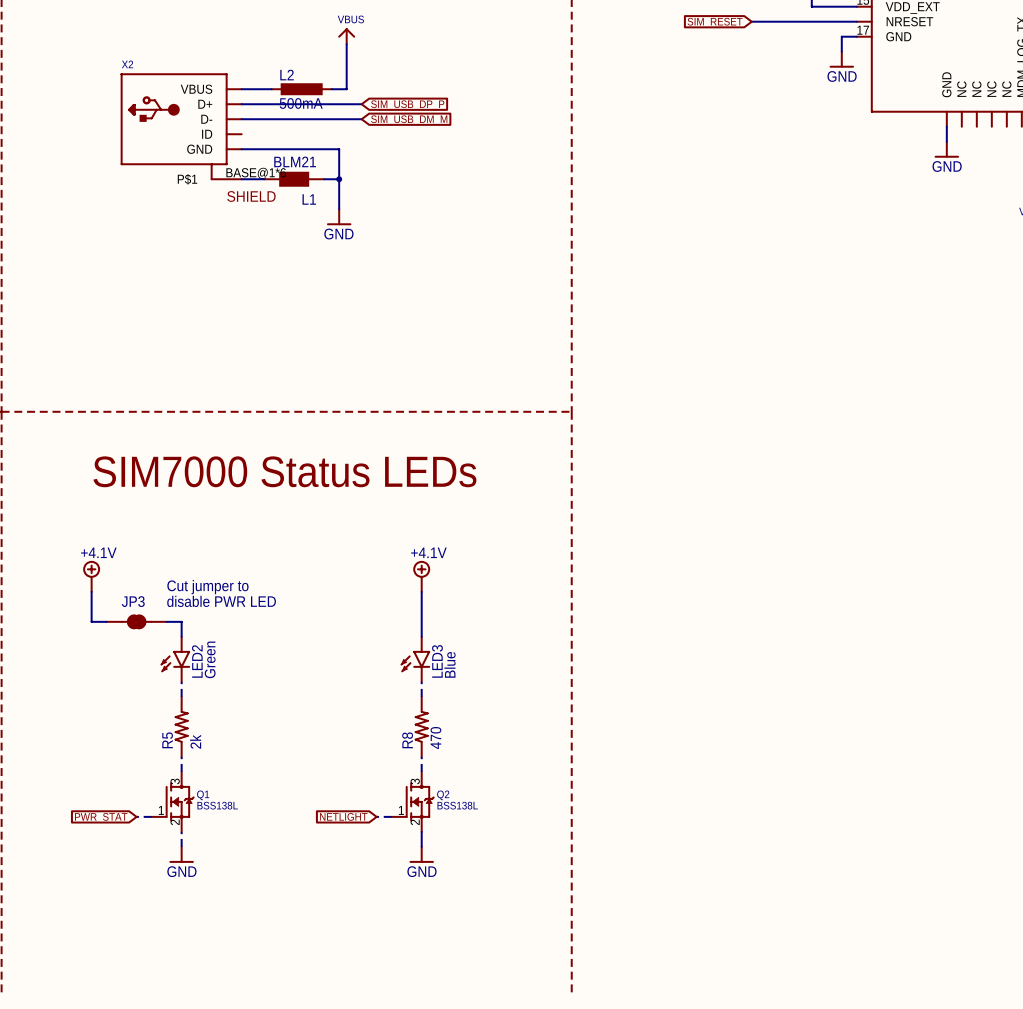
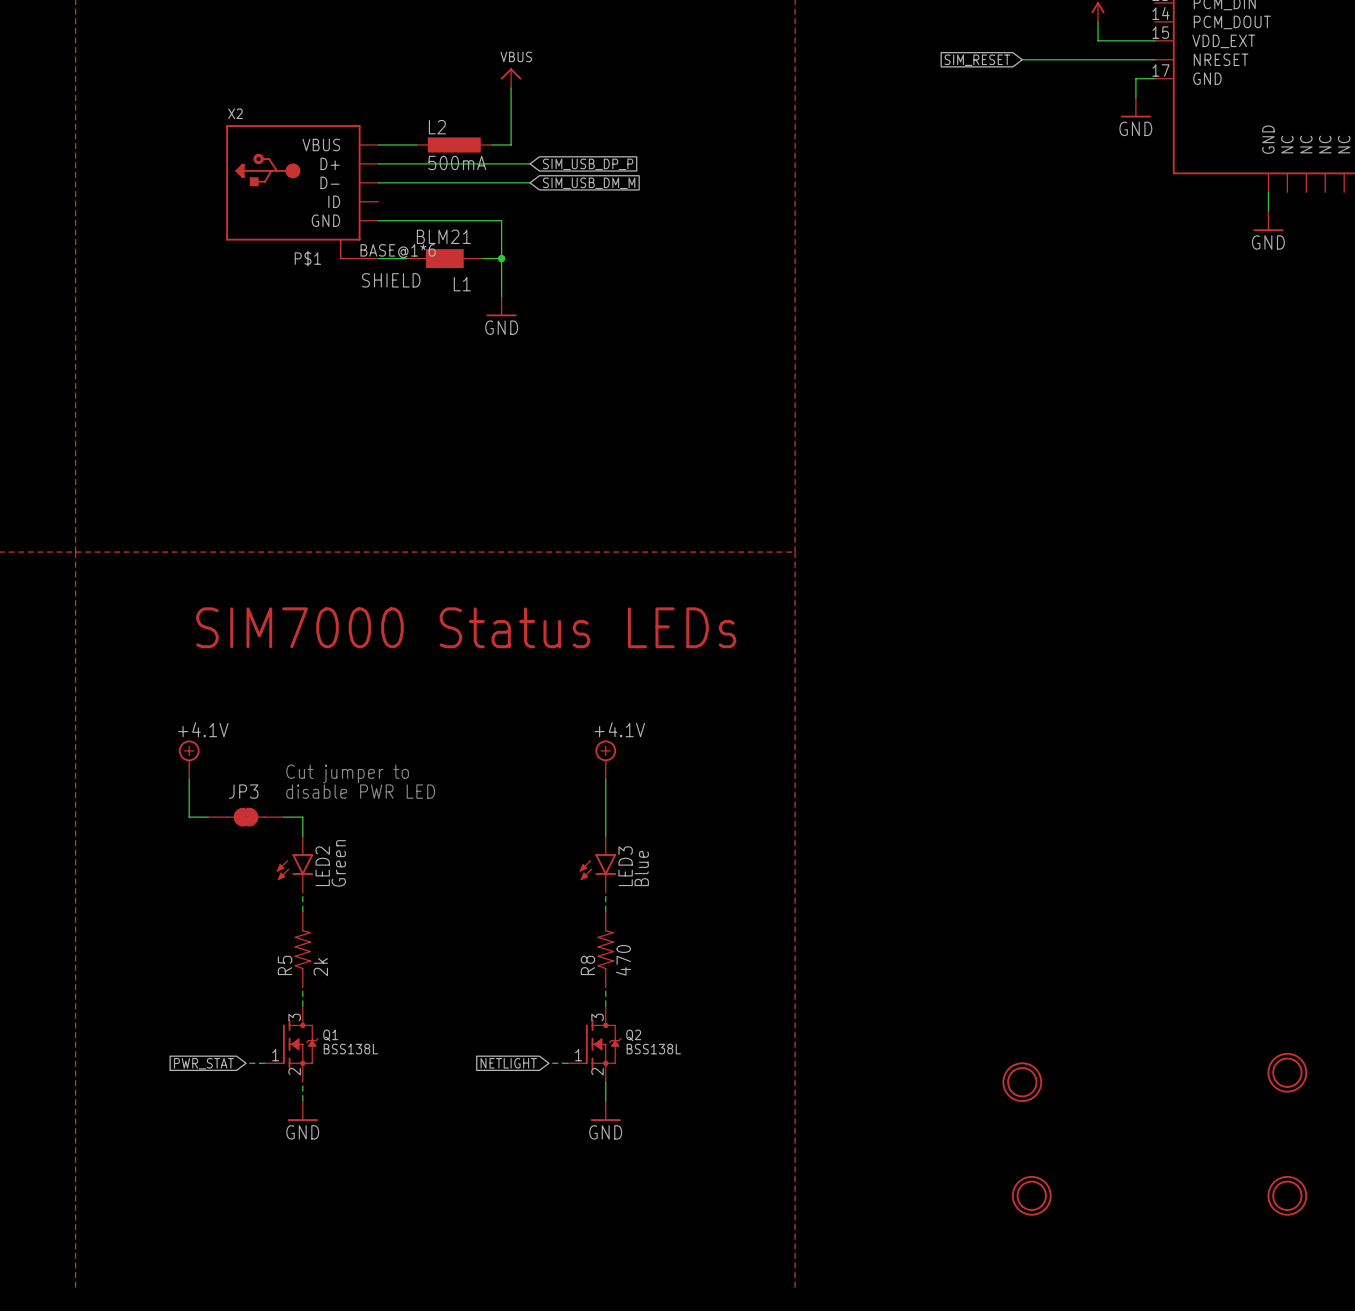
part: none -> (1287, 1072)
part: none -> (1022, 1082)
part: none -> (1031, 1195)
part: none -> (1287, 1195)

